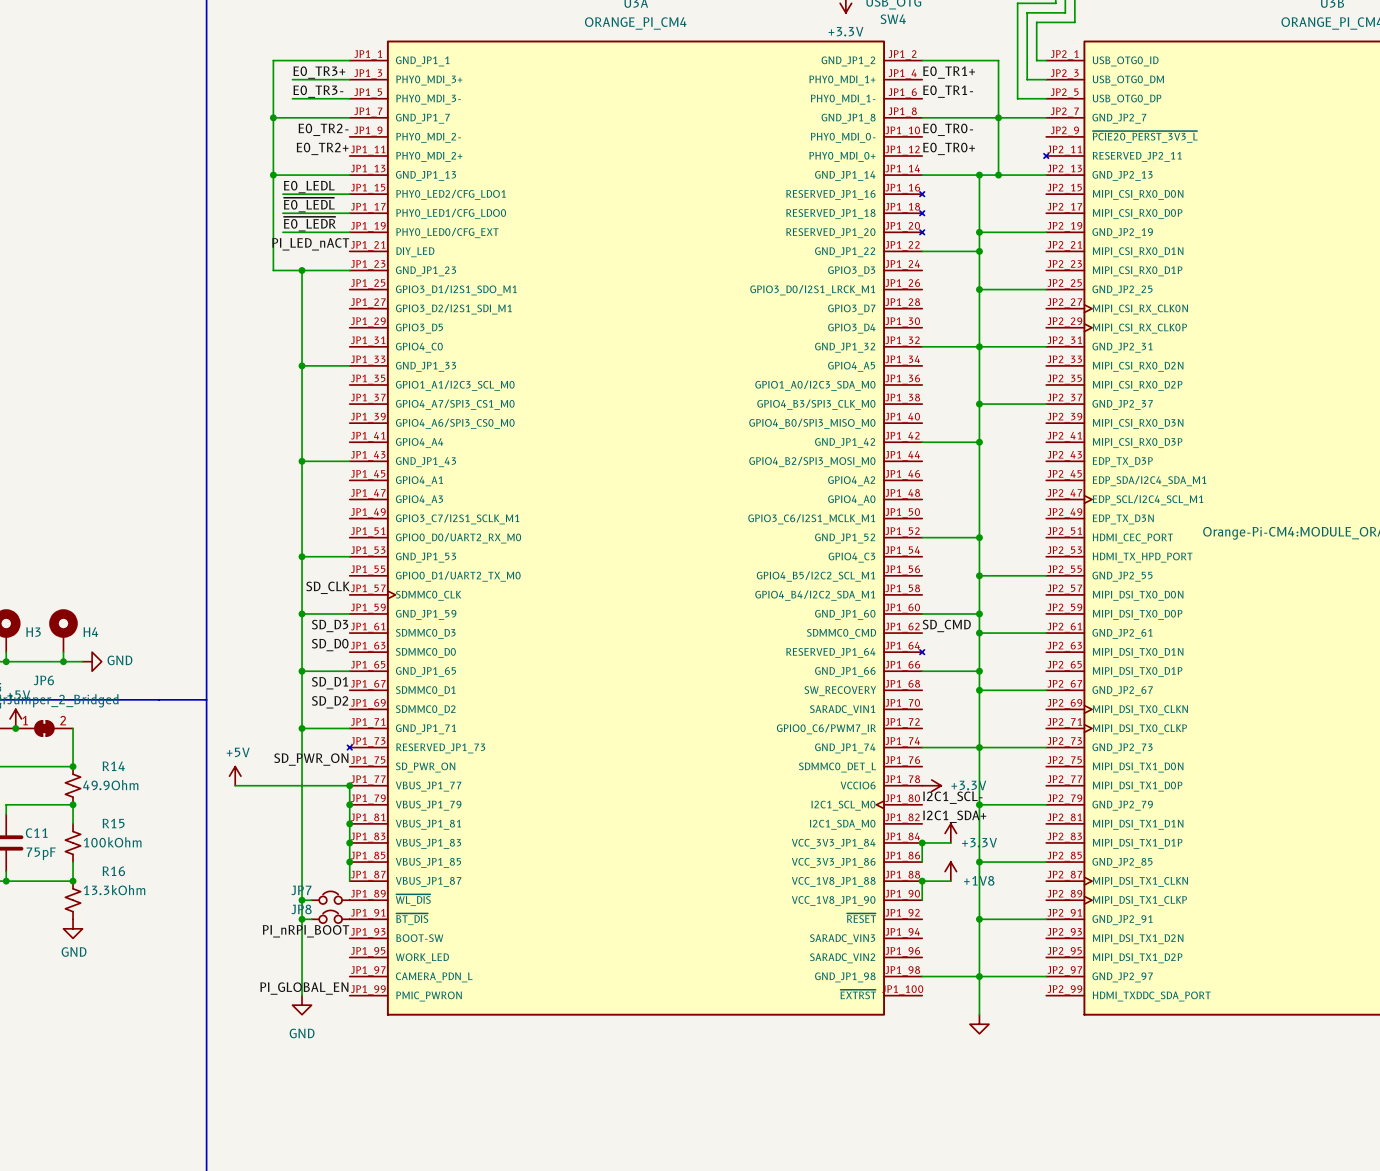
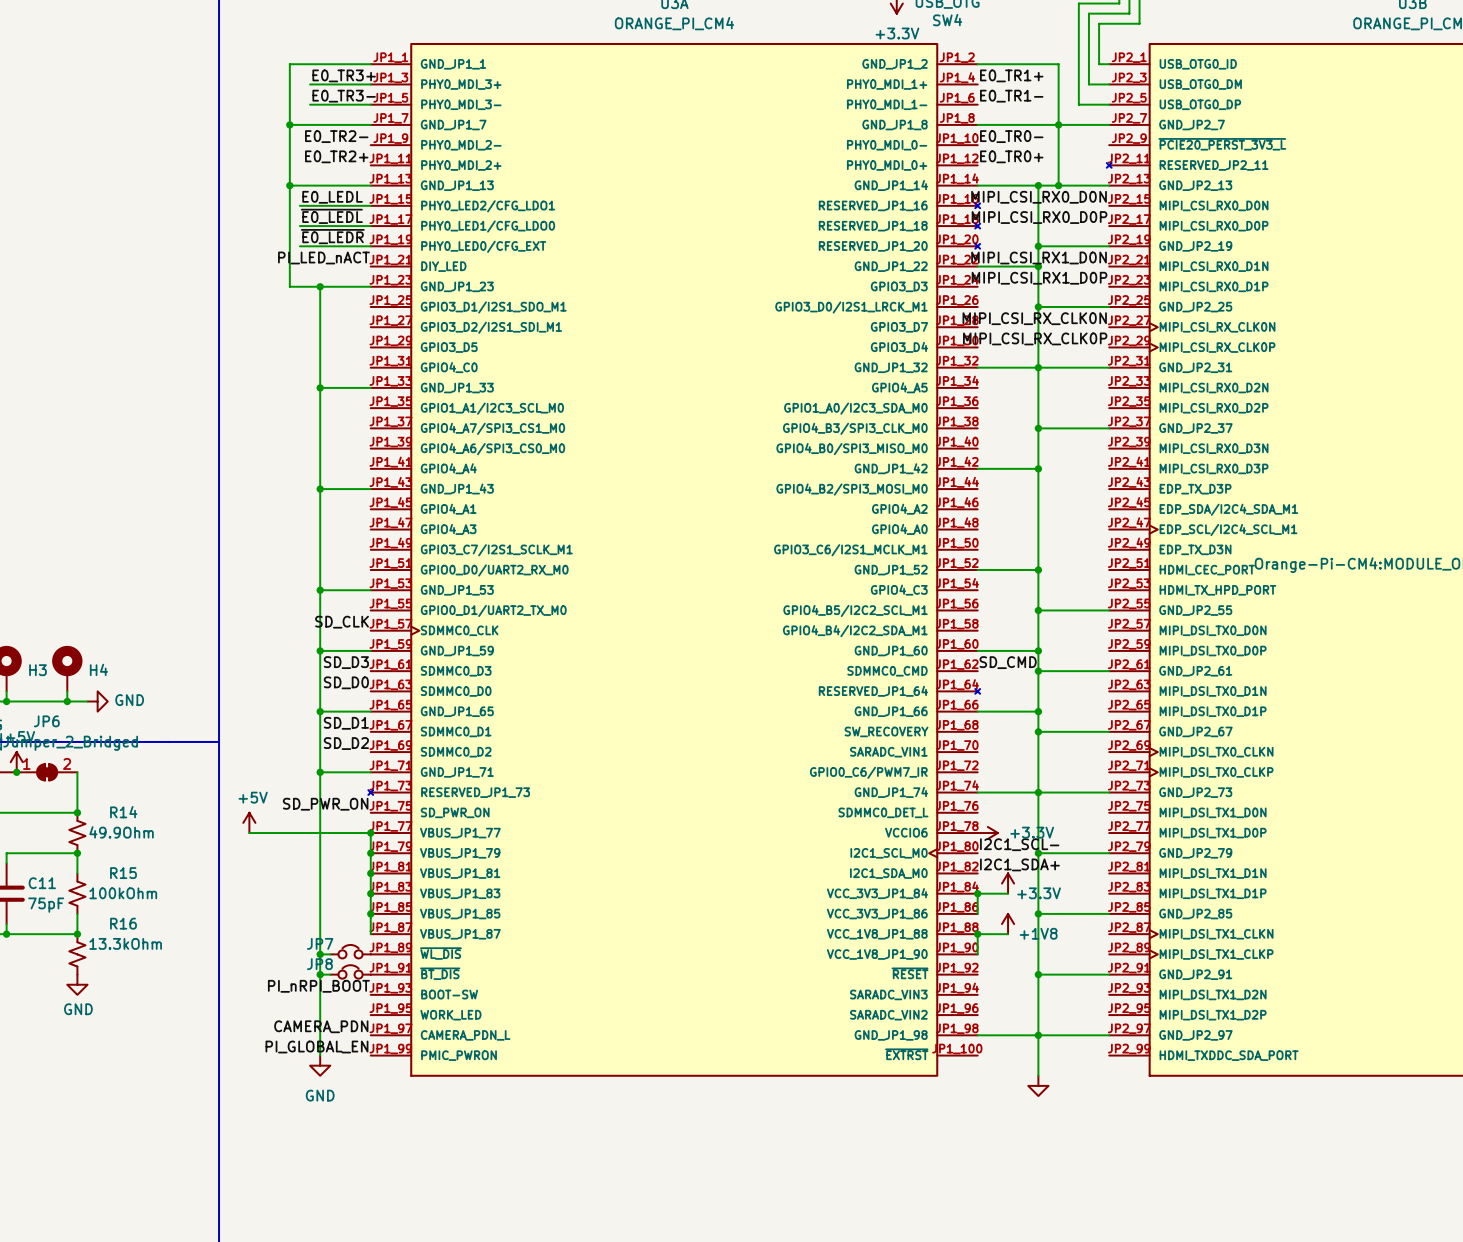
label: none -> MIPI_CSI_RX0_D0N (1039, 197)
label: none -> MIPI_CSI_RX0_D0P (1039, 217)
label: none -> MIPI_CSI_RX1_D0N (1039, 257)
label: none -> MIPI_CSI_RX1_D0P (1039, 278)
label: none -> MIPI_CSI_RX_CLK0N (1034, 318)
label: none -> MIPI_CSI_RX_CLK0P (1035, 338)
label: none -> CAMERA_PDN (321, 1026)

